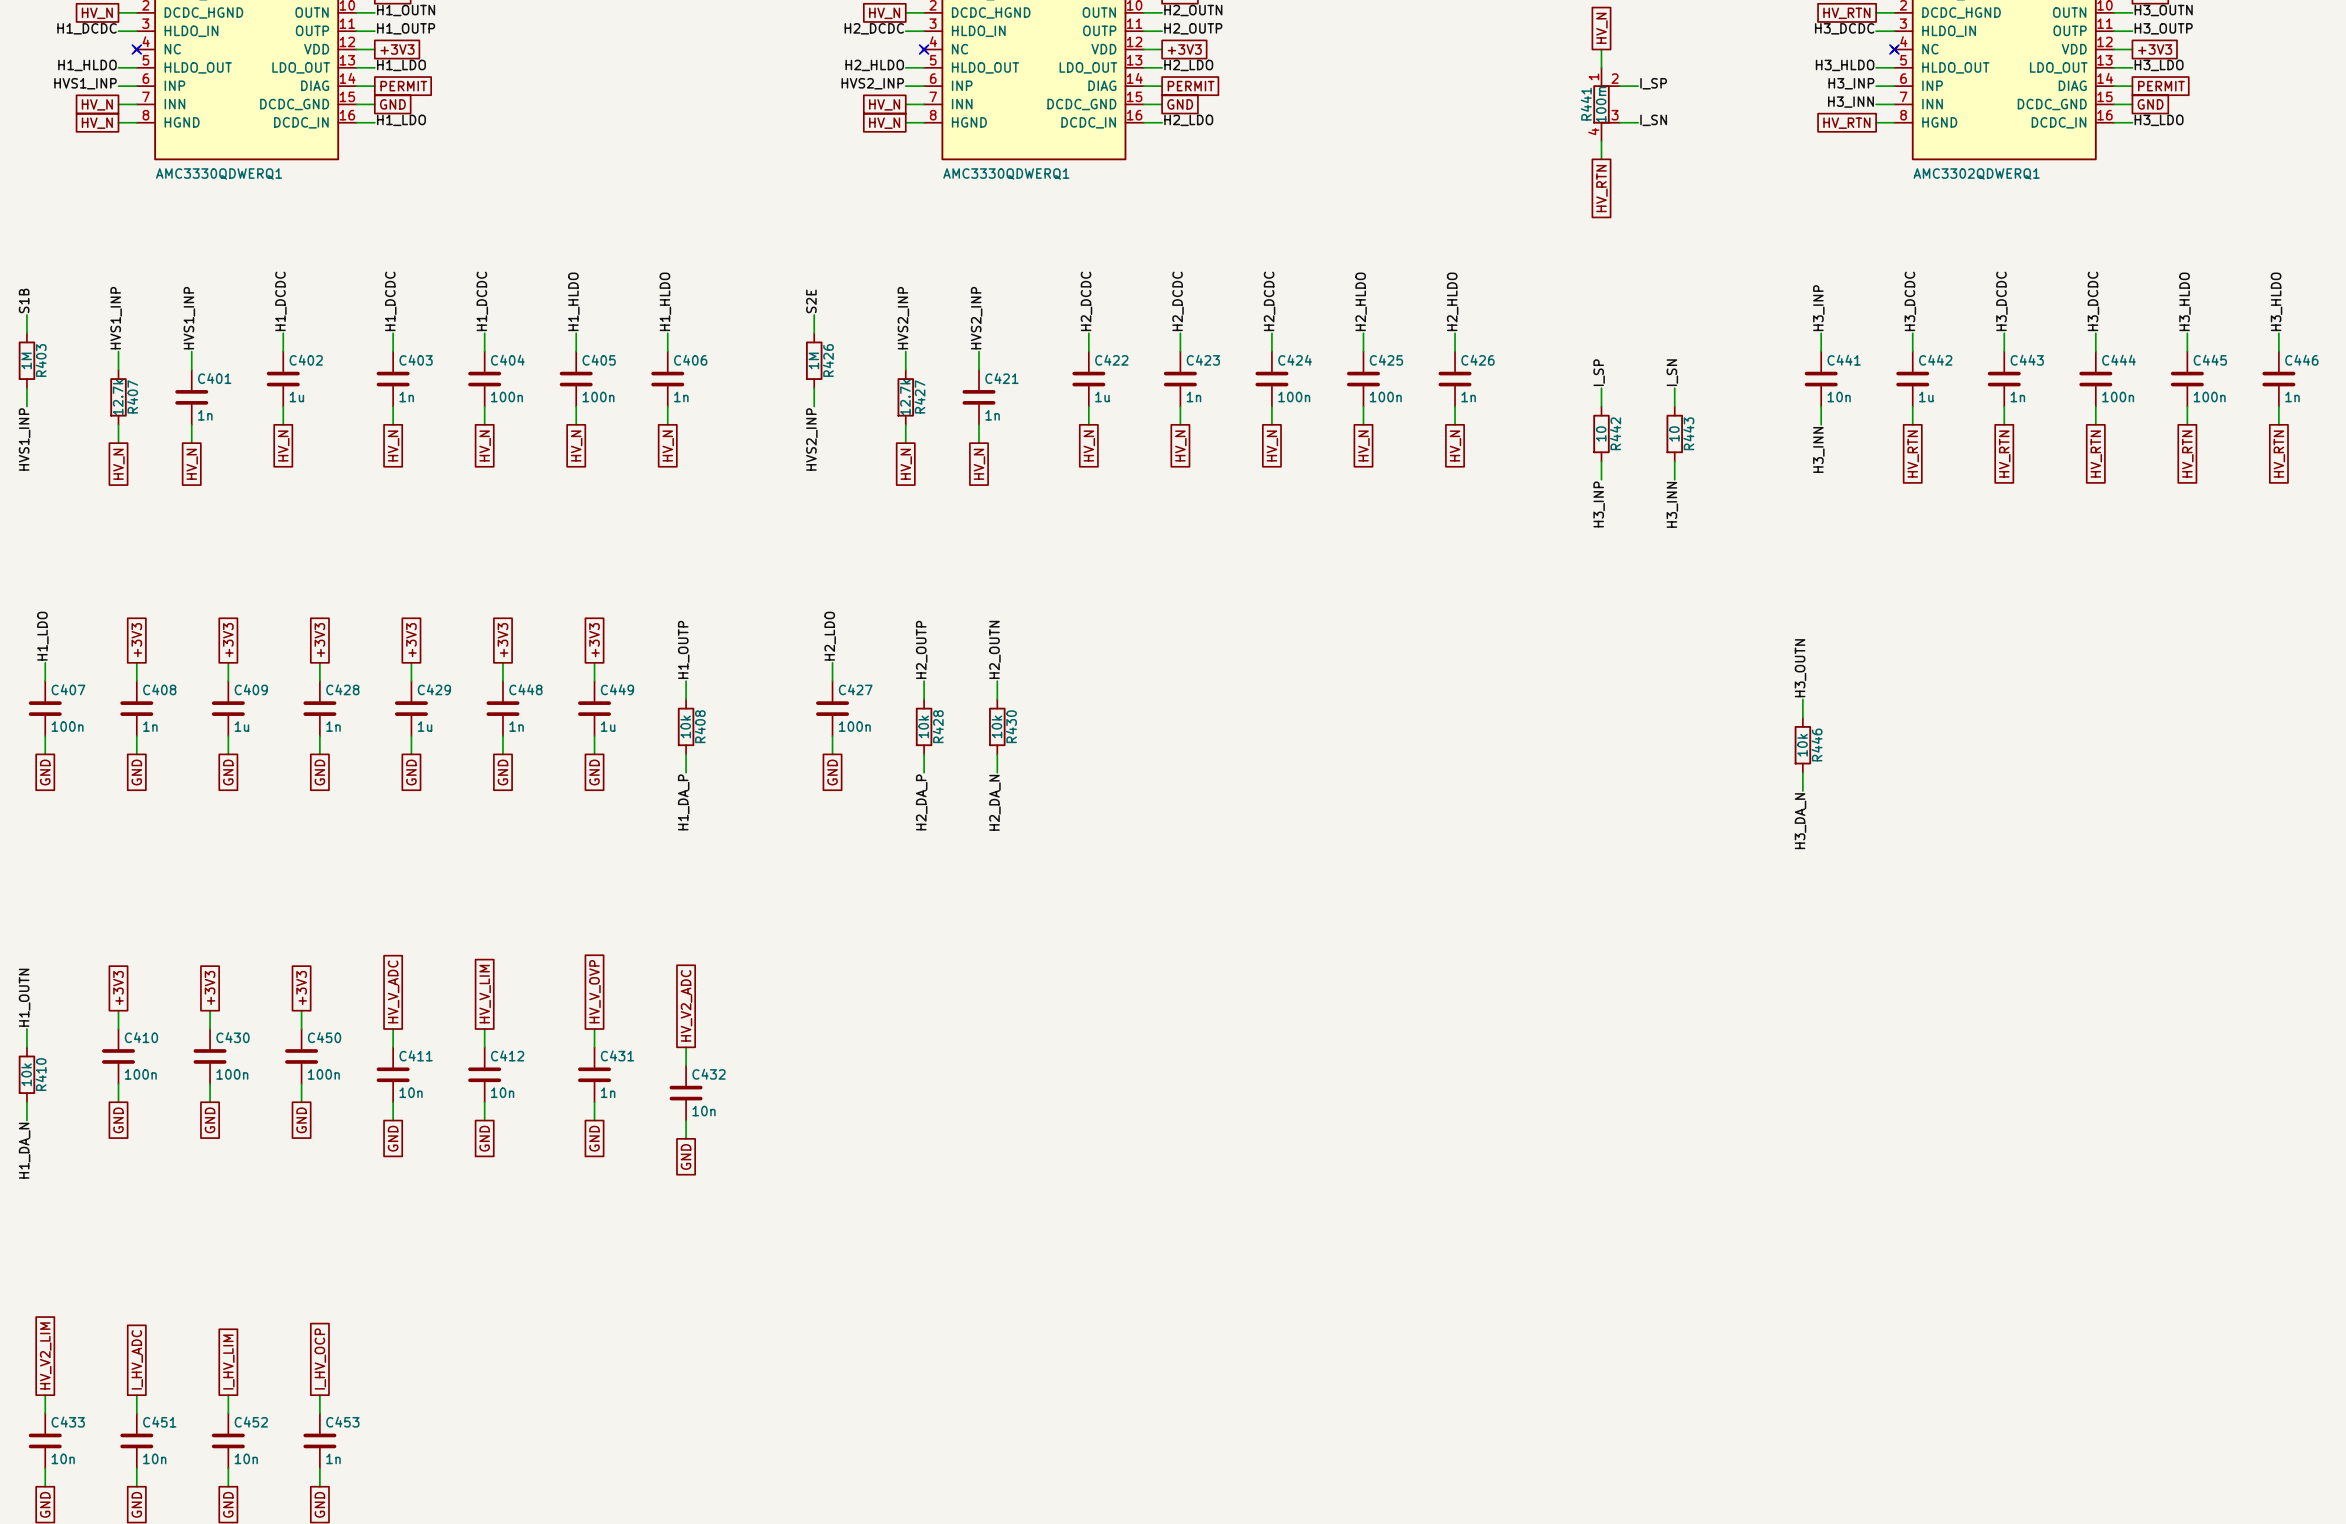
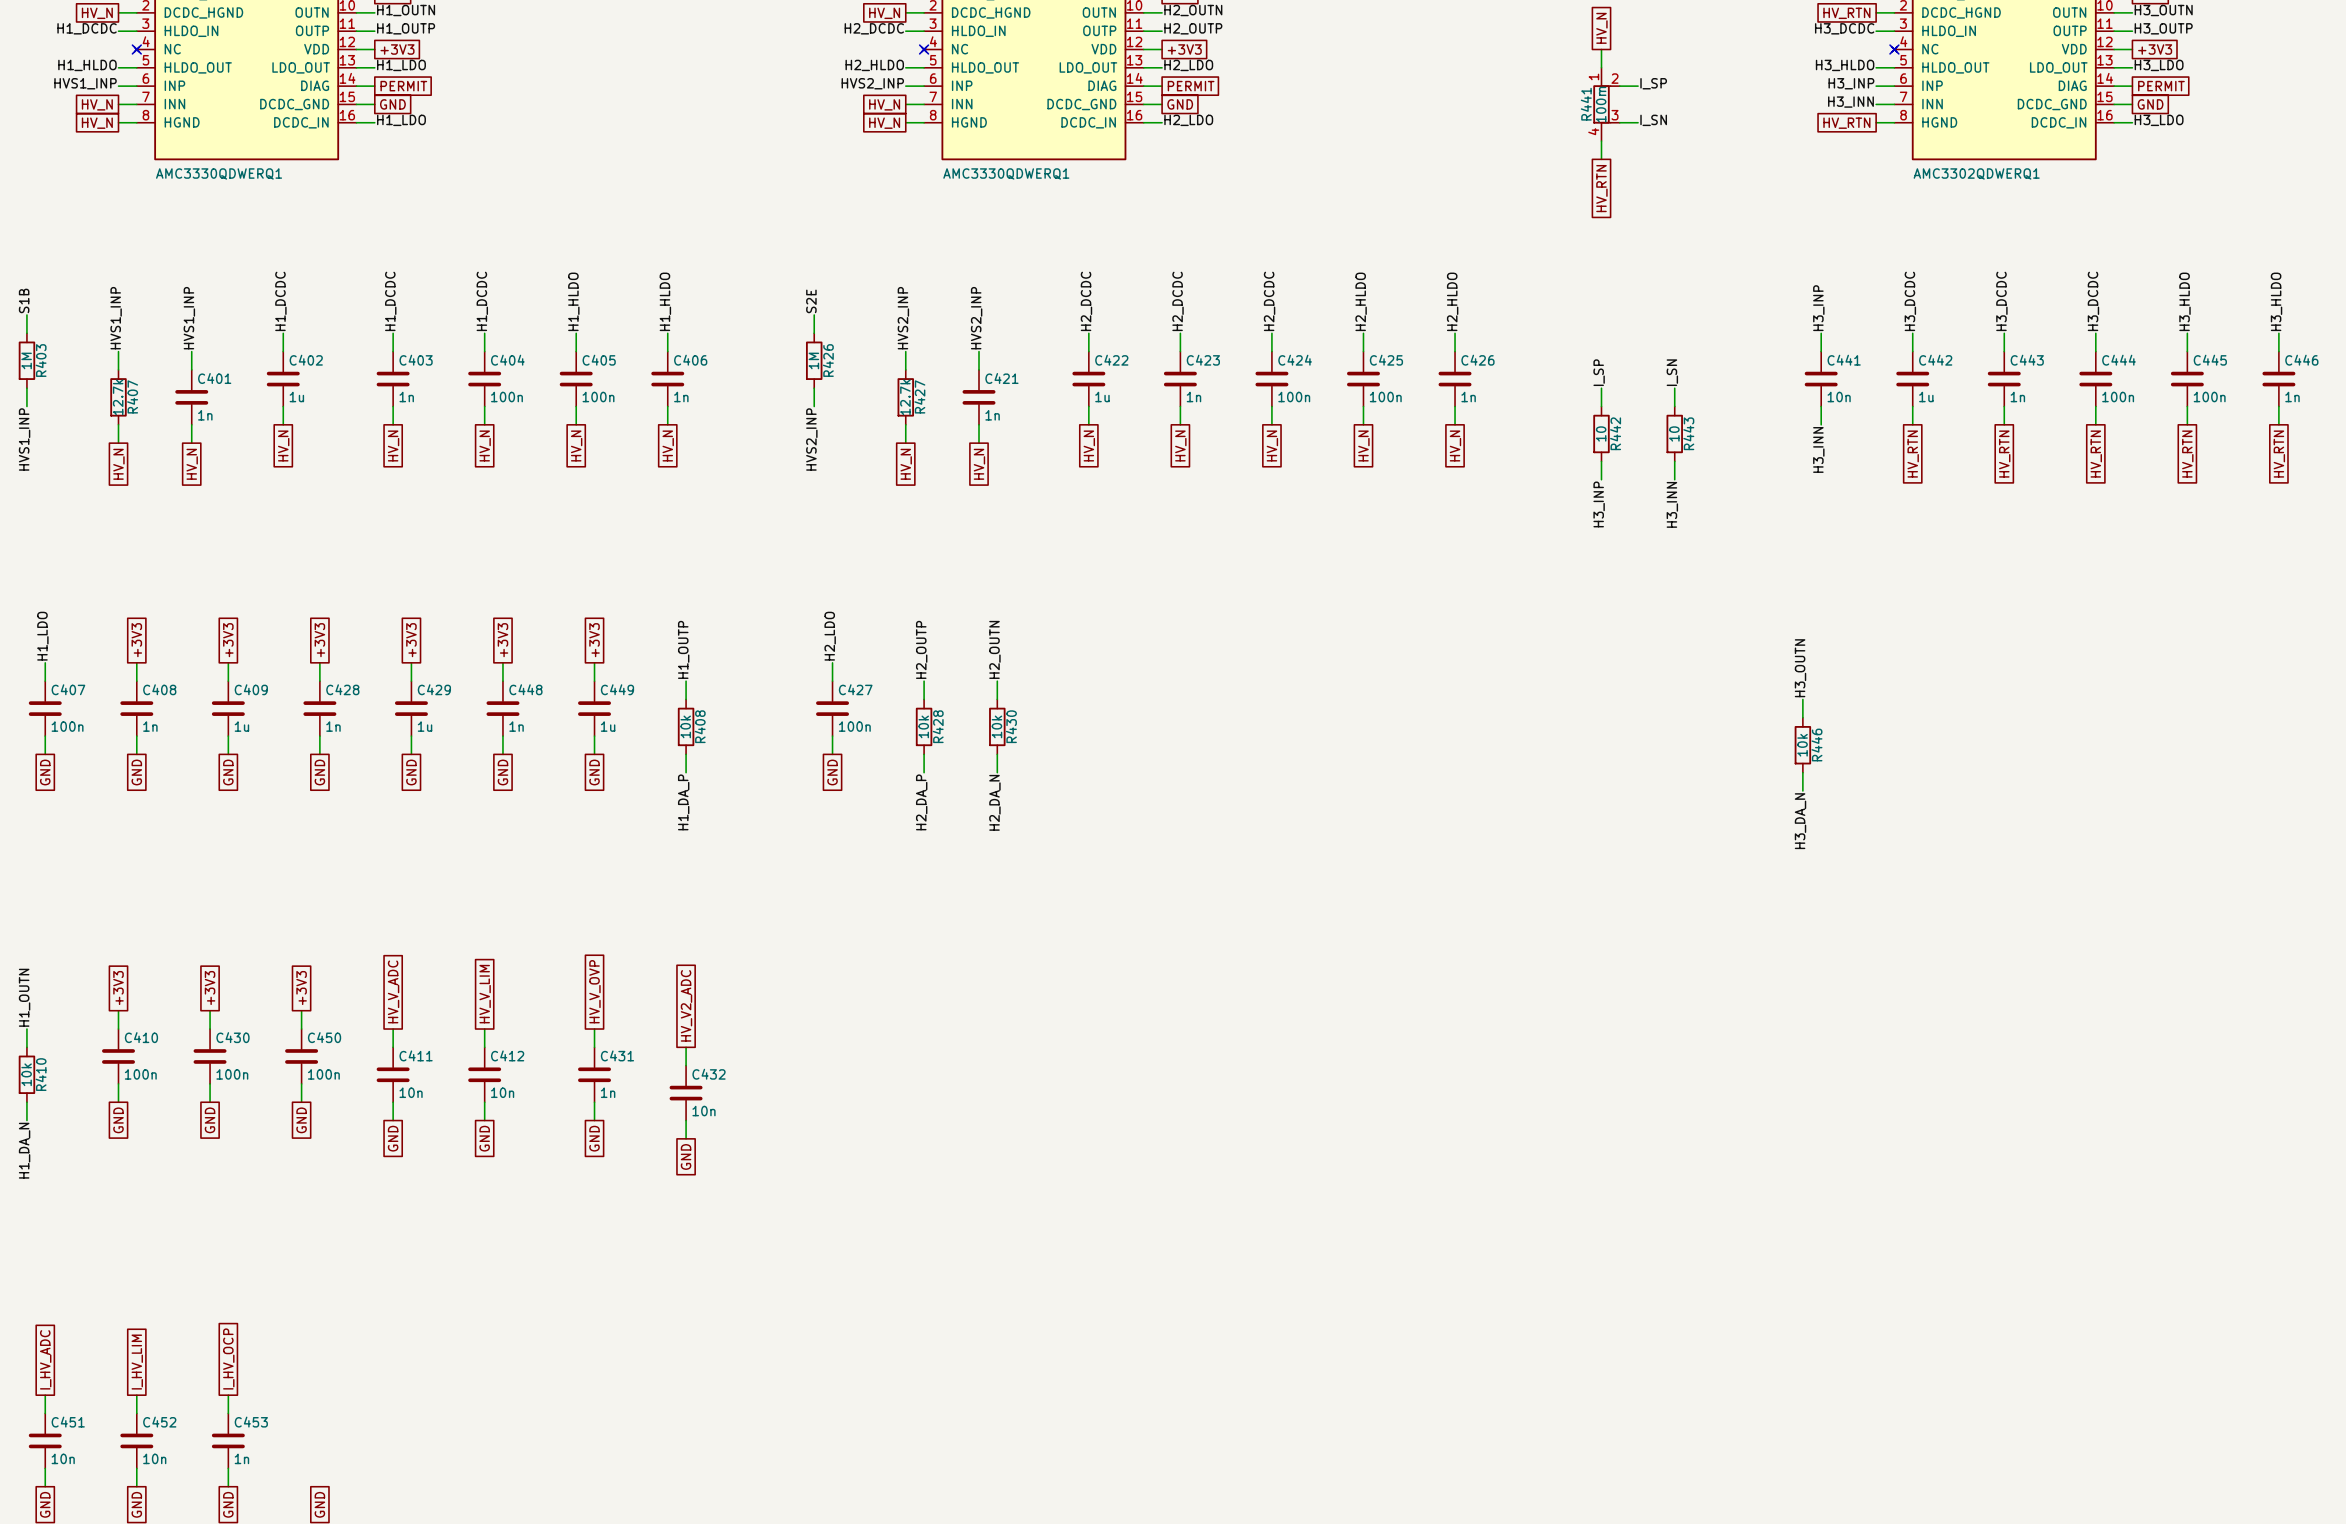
global label: HV_V2_LIM (45, 1355) -> I_HV_ADC (45, 1359)
global label: I_HV_OCP (320, 1358) -> none
global label: I_HV_ADC (137, 1359) -> I_HV_LIM (137, 1362)
global label: I_HV_LIM (228, 1362) -> I_HV_OCP (228, 1358)
wire: (319, 1395) (319, 1413) -> none
C433 name: C433 (68, 1422) -> C451 (68, 1422)
C451 name: C451 (159, 1422) -> C452 (159, 1422)
C452 name: C452 (251, 1422) -> C453 (251, 1422)
C453: 1n (319, 1440) -> none
C452 value: 10n (246, 1458) -> 1n (241, 1458)
wire: (319, 1468) (319, 1486) -> none

